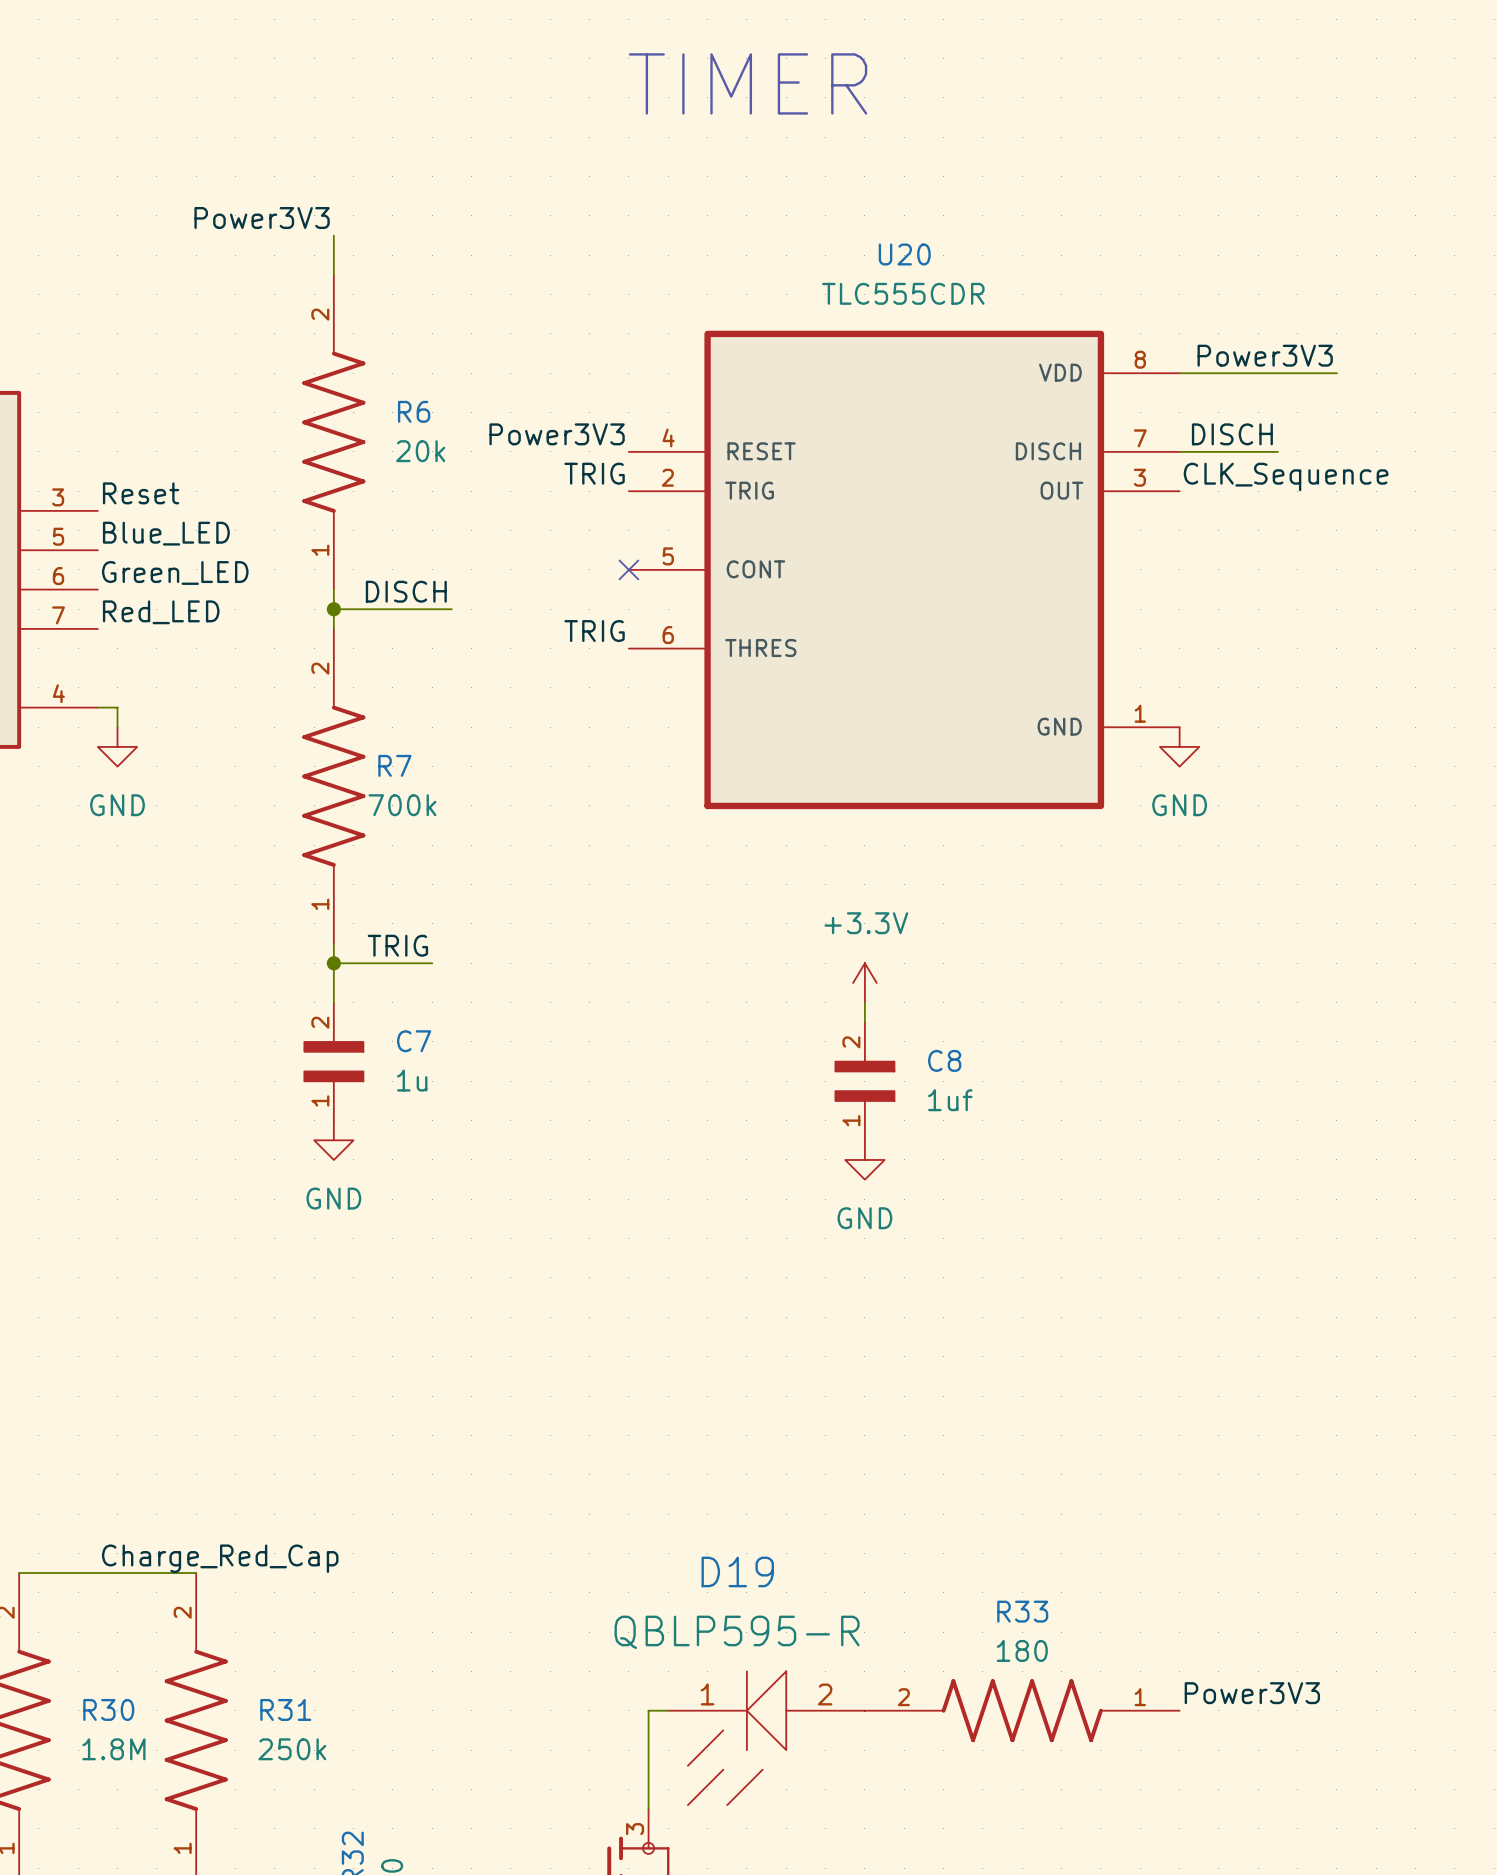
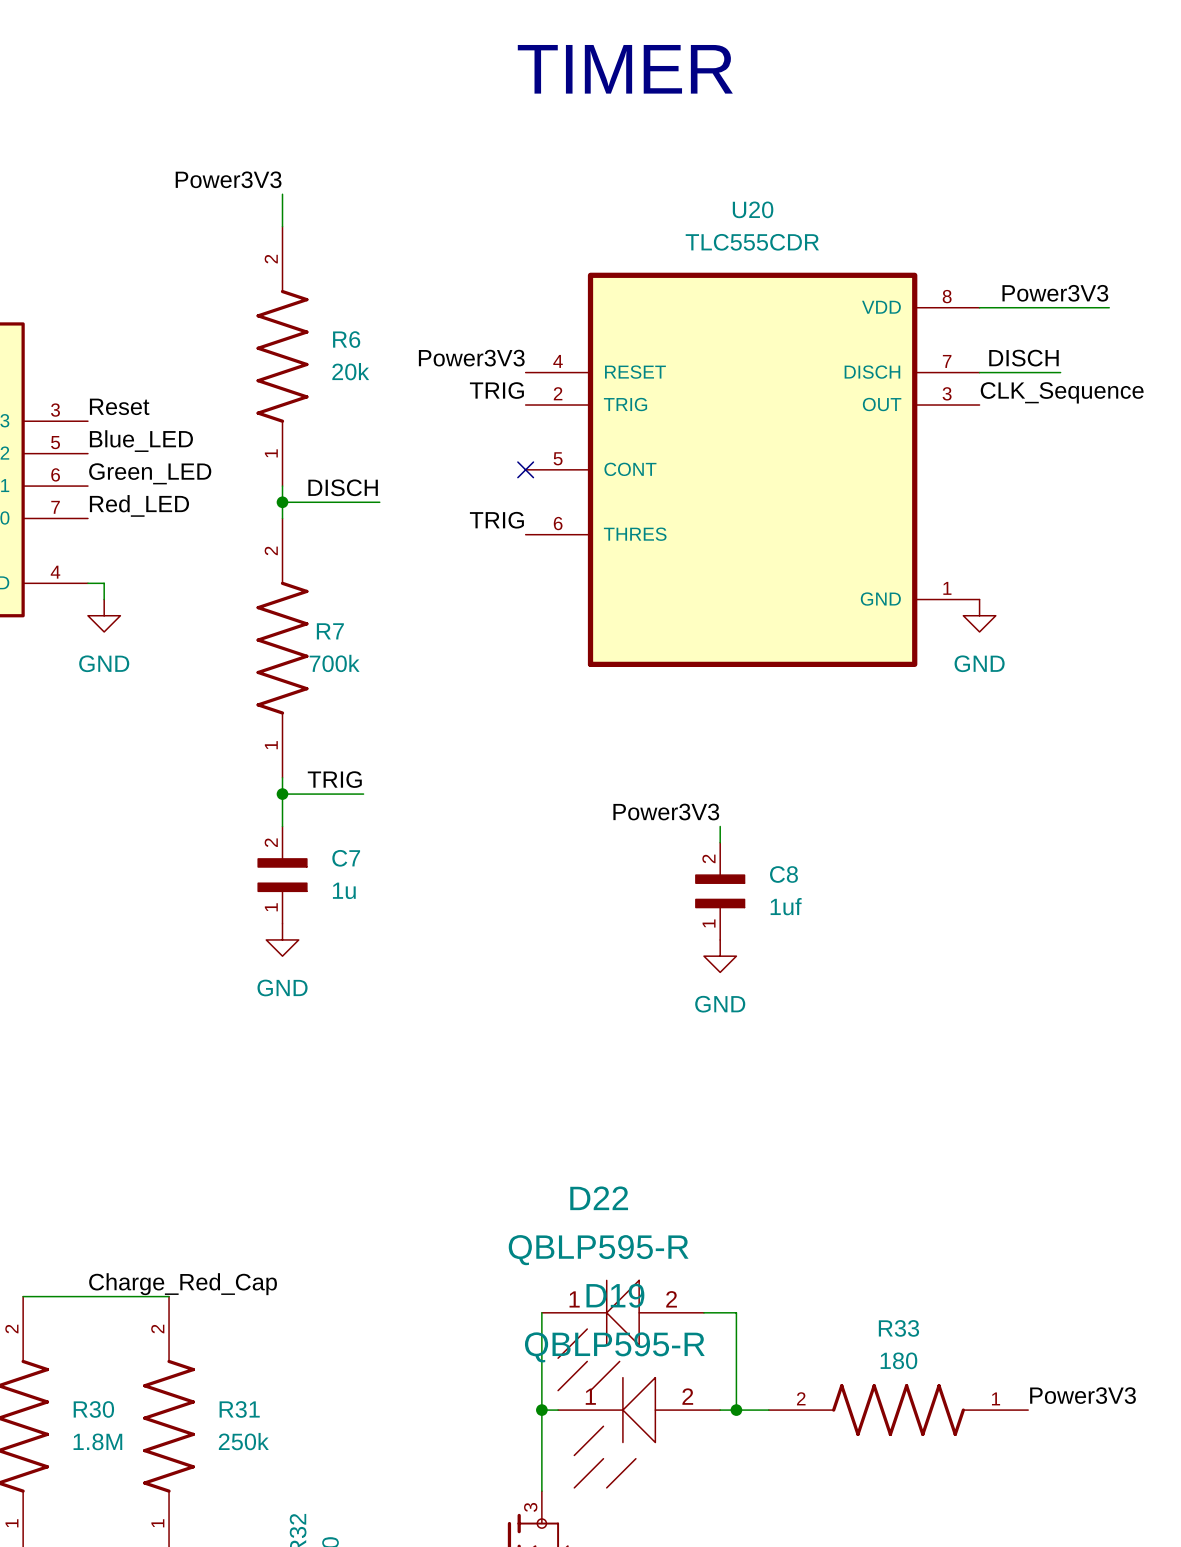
power symbol: +3.3V (864, 982) -> none
label: none -> Power3V3 (666, 812)
wire: none -> (541, 1312) (541, 1410)
wire: none -> (703, 1312) (736, 1312) (736, 1410)
D22: none -> QBLP595-R (622, 1335)
label position: Power3V3 (1252, 1693) -> Power3V3 (1083, 1395)
junction: none -> (541, 1410)
junction: none -> (736, 1410)
R33 position: (1022, 1710) -> (898, 1410)

